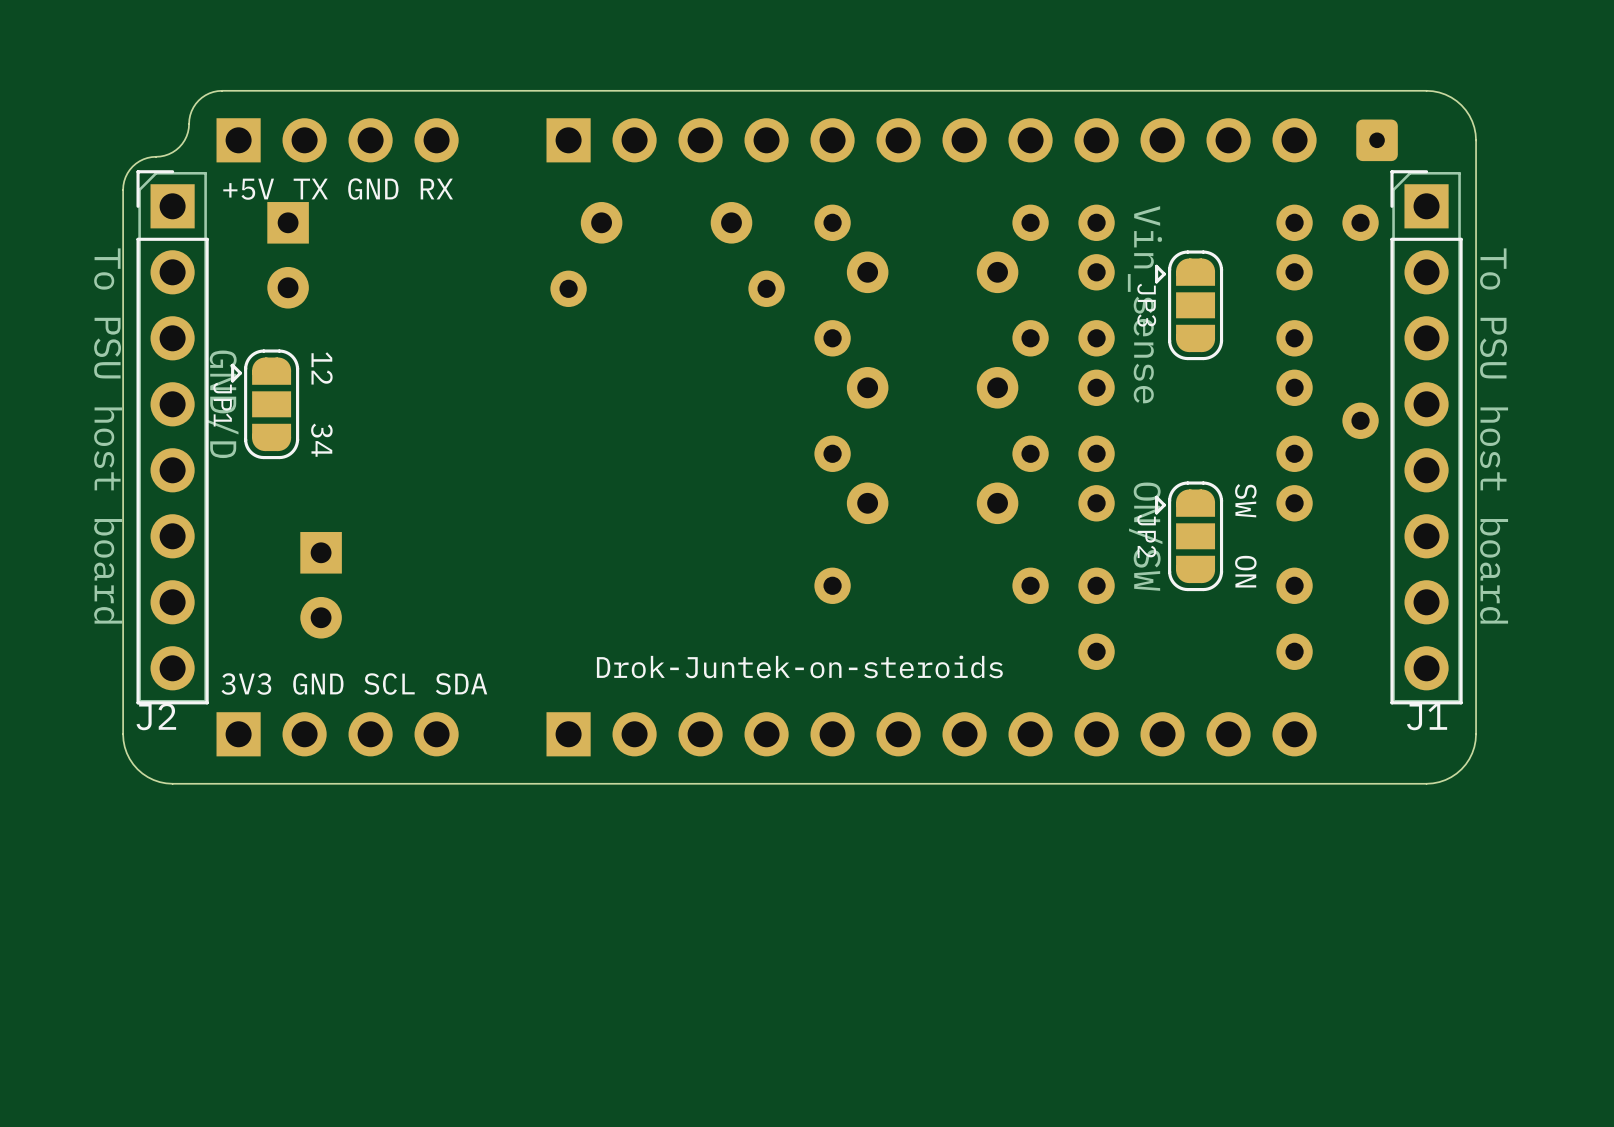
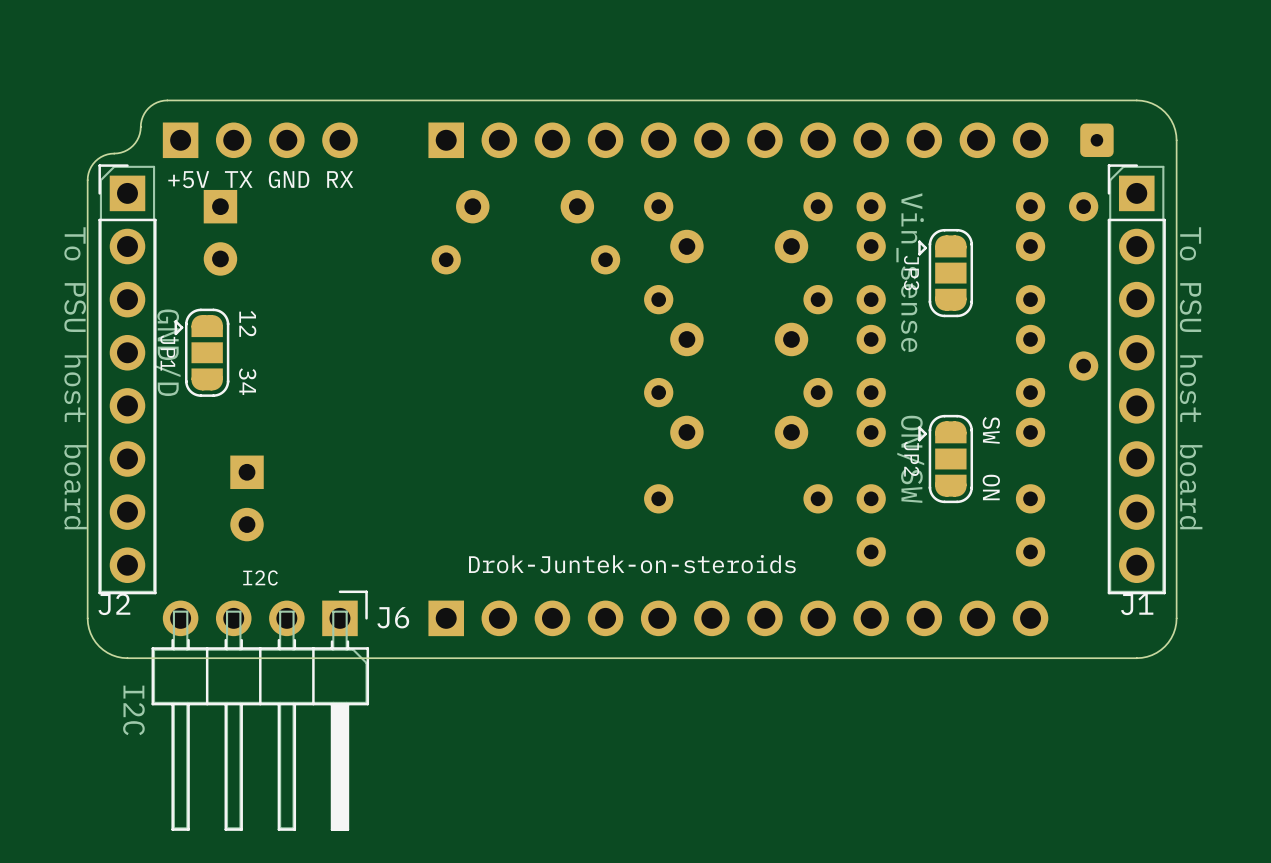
text: 3V3 GND SCL SDA (354, 684) -> I2C (260, 577)
J6 side: top (337, 734) -> bottom (260, 710)

